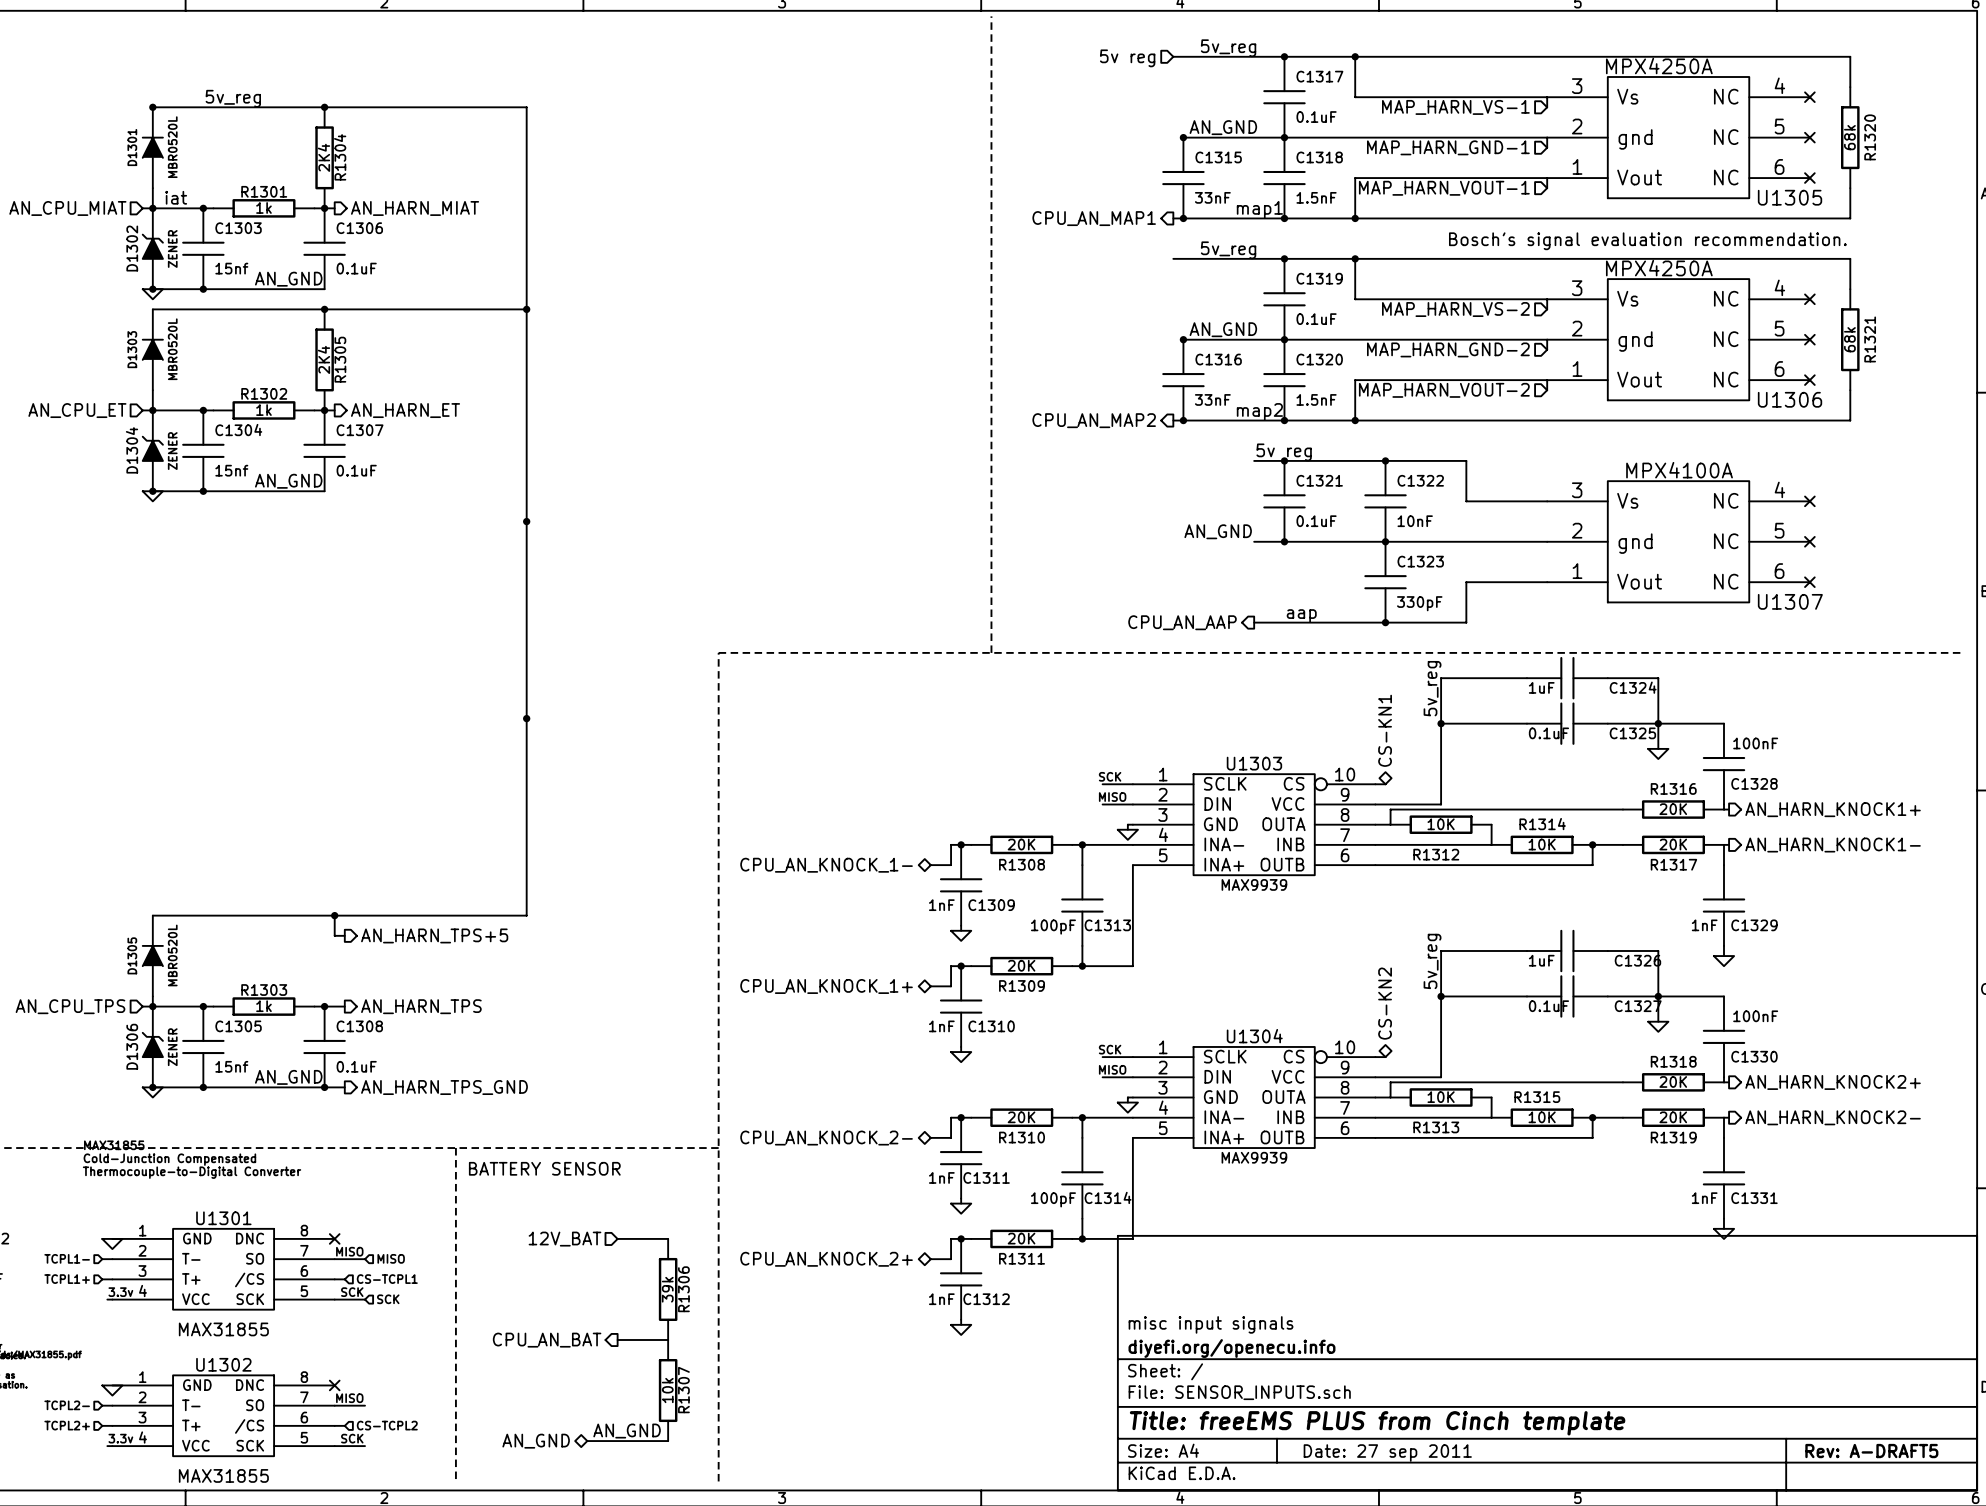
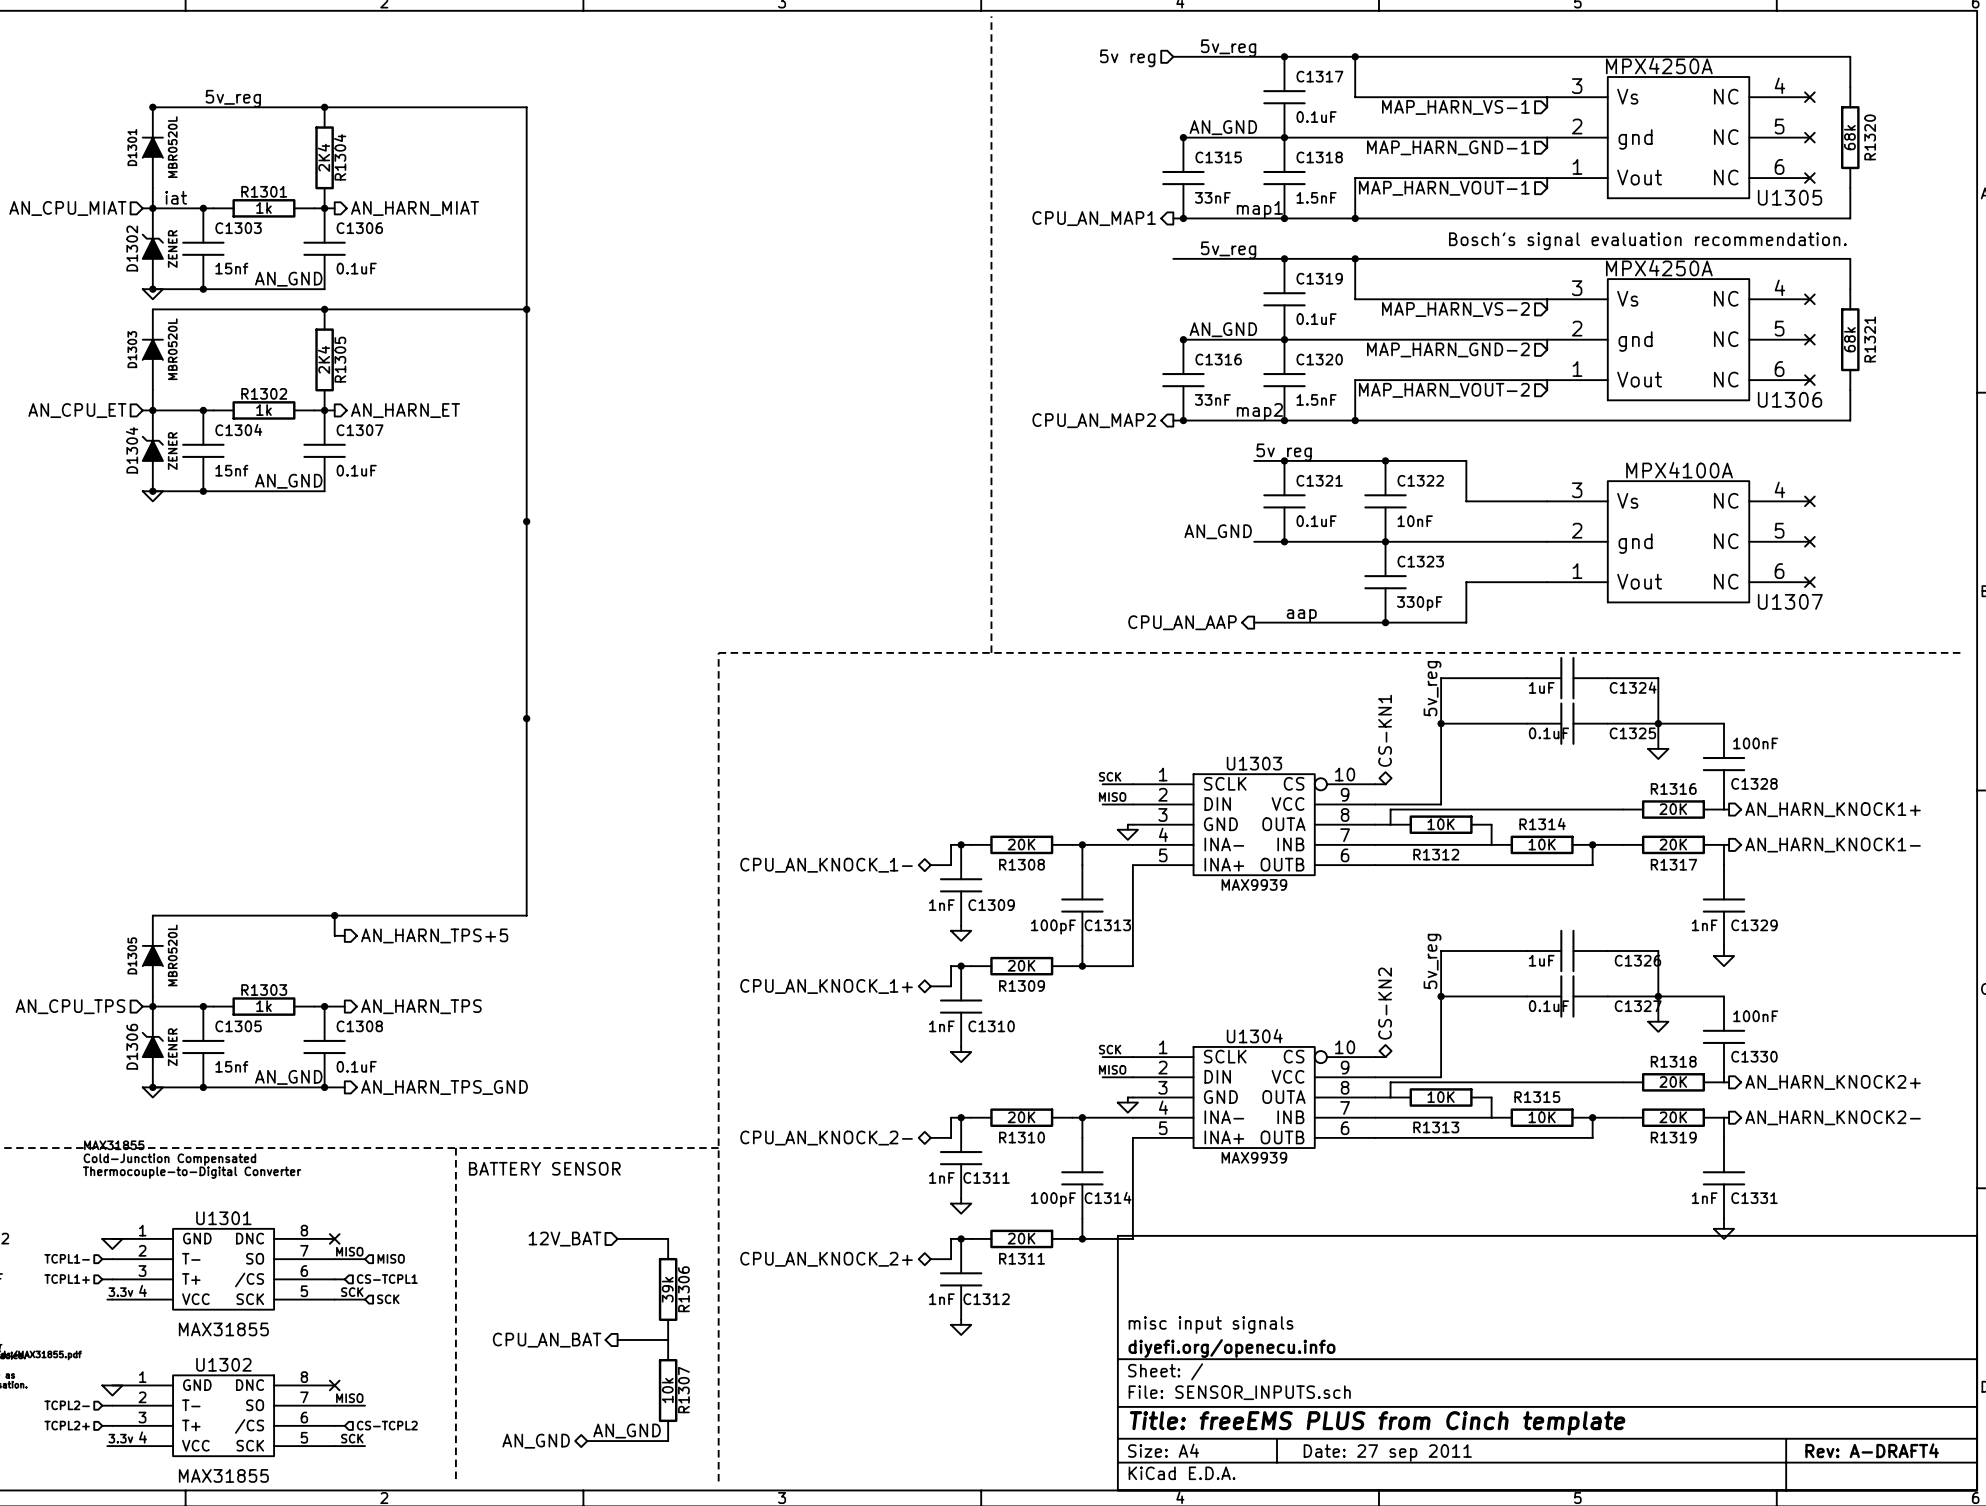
title block: Rev: A-DRAFT5 (1871, 1451) -> Rev: A-DRAFT4 (1872, 1450)

